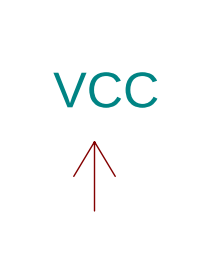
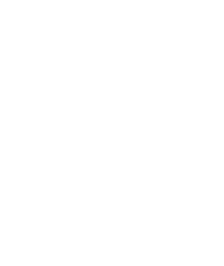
power symbol: VCC (94, 176) -> none

